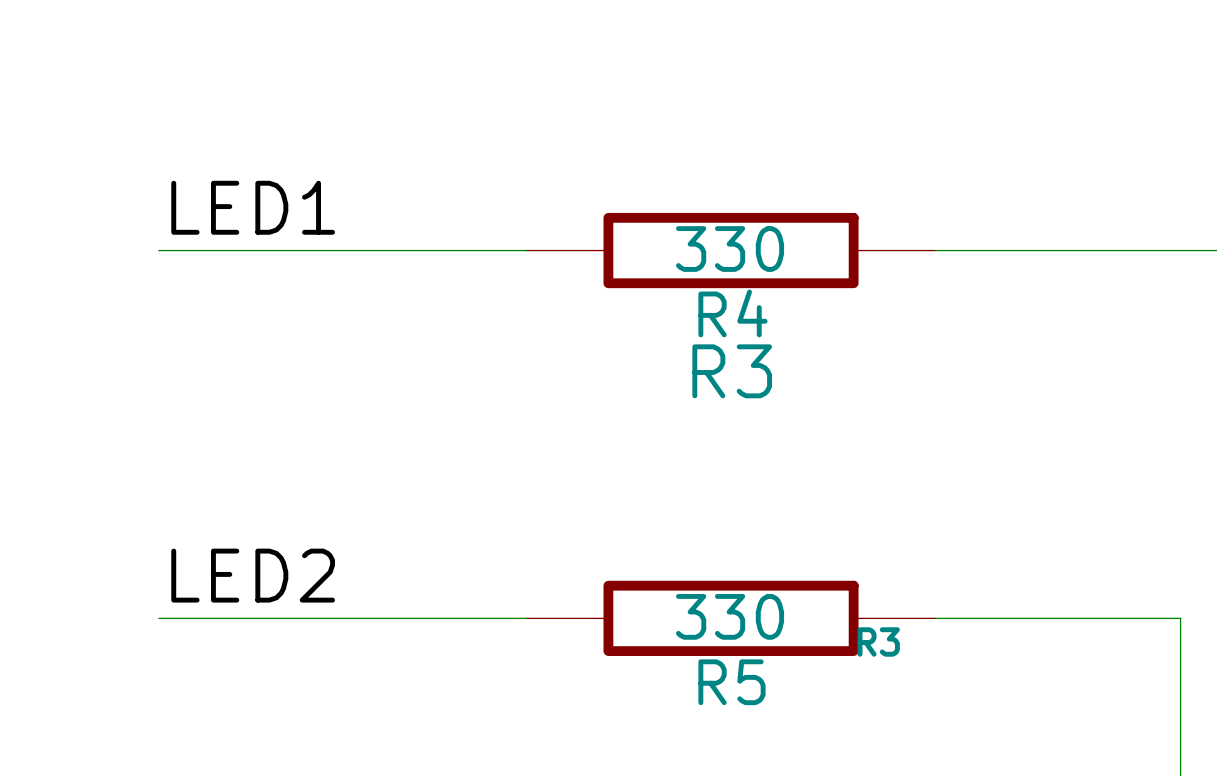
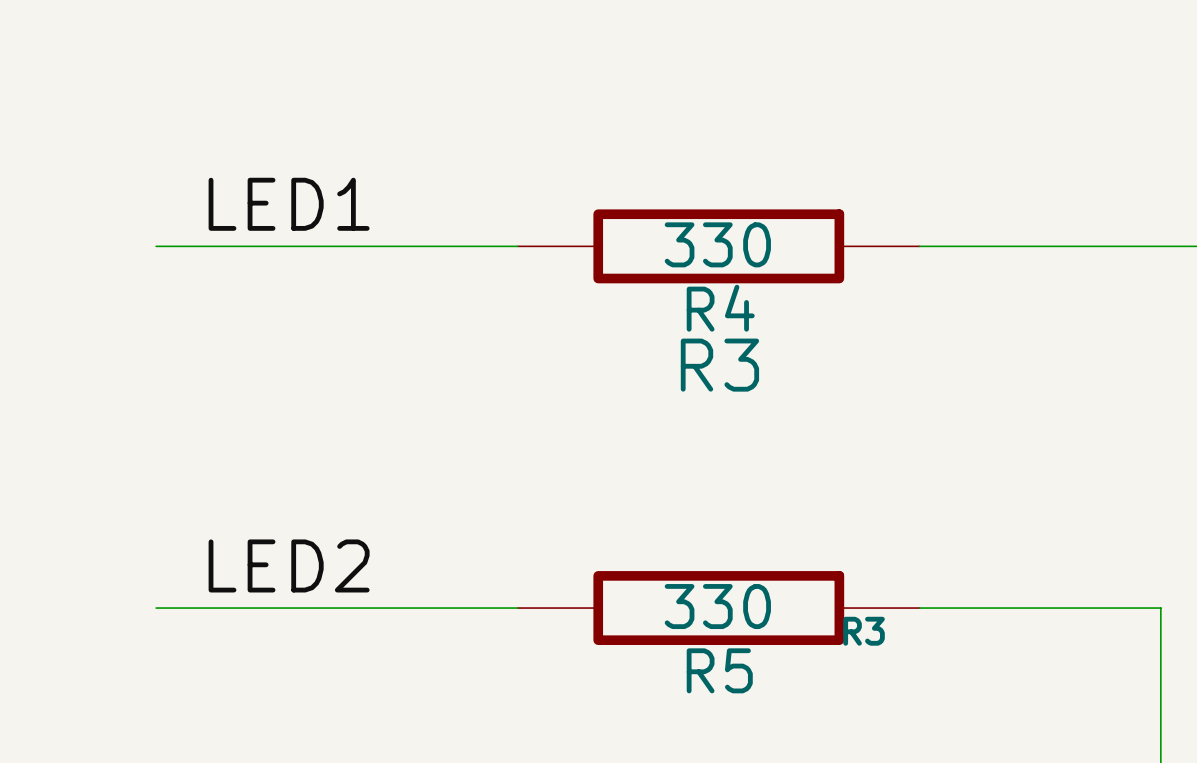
label position: LED1 (253, 207) -> LED1 (289, 204)
label position: LED2 (253, 575) -> LED2 (289, 565)

